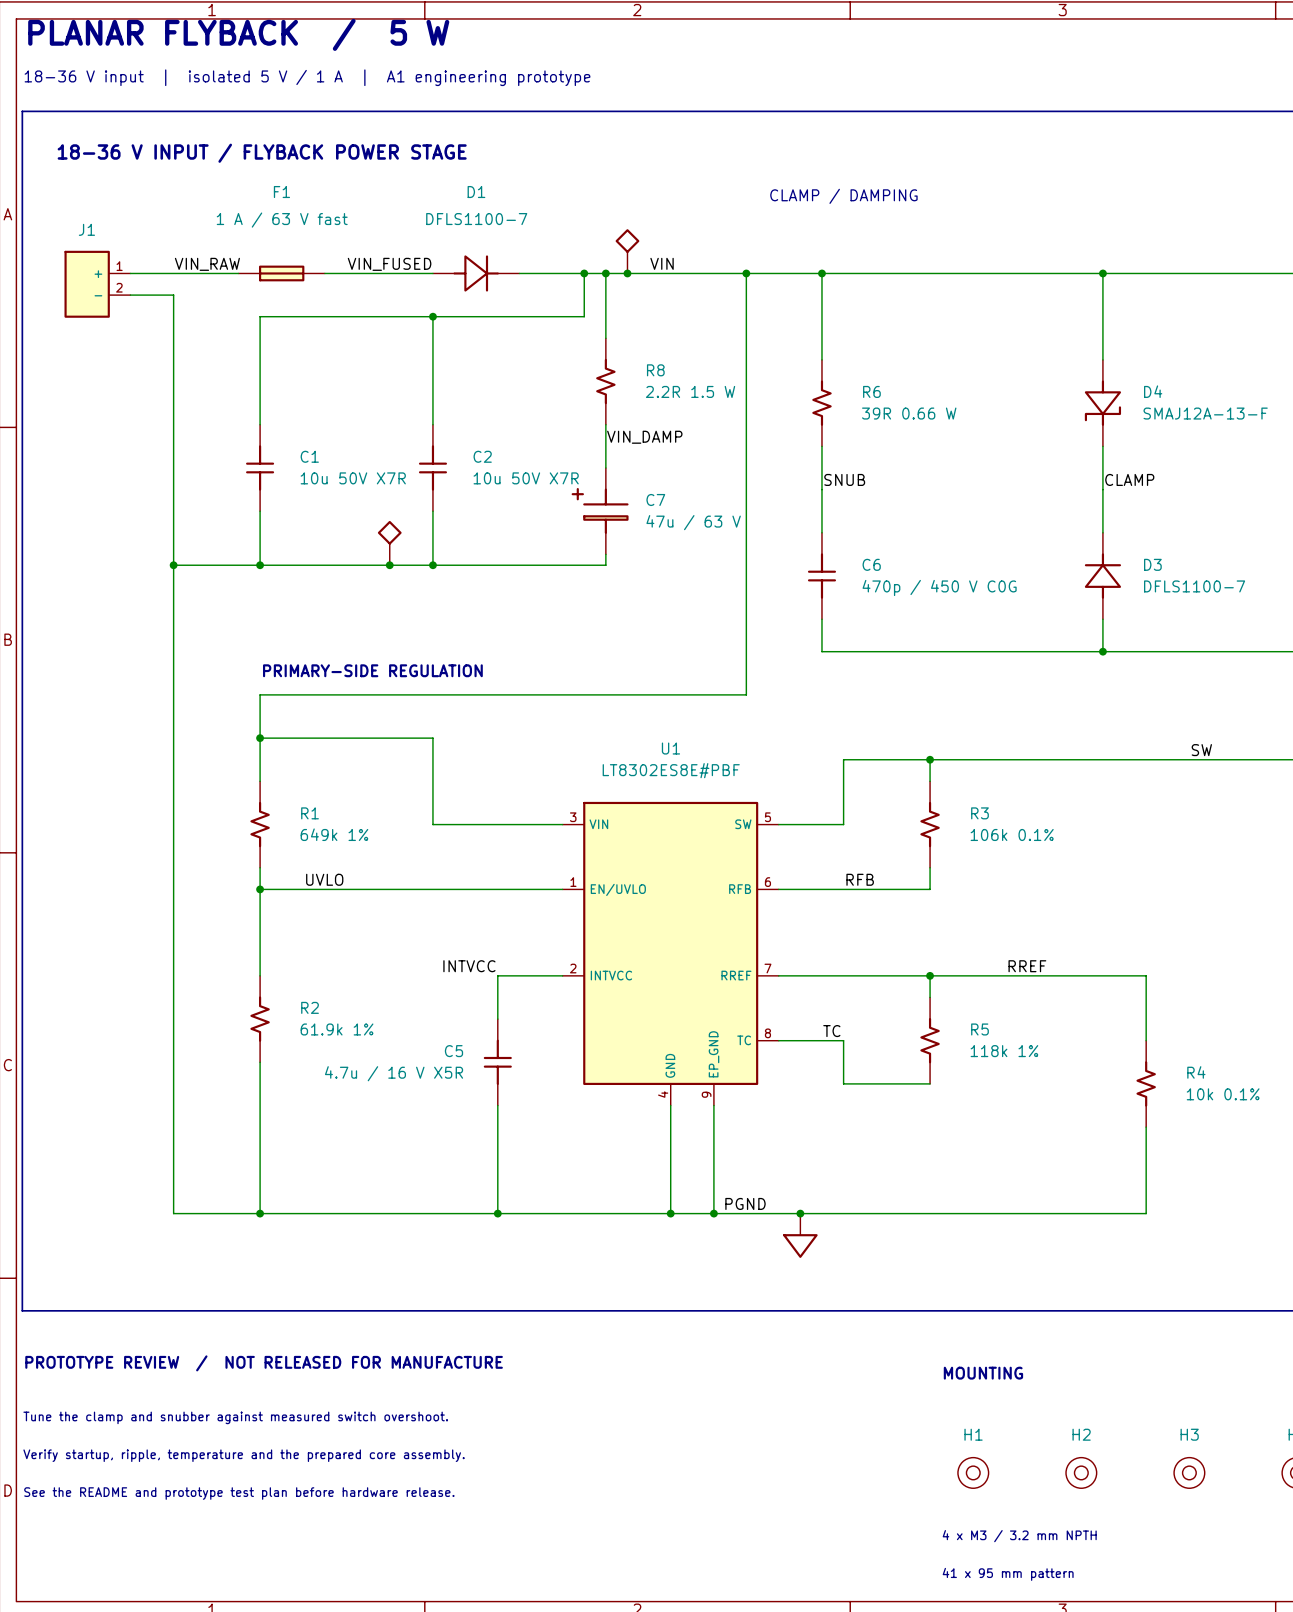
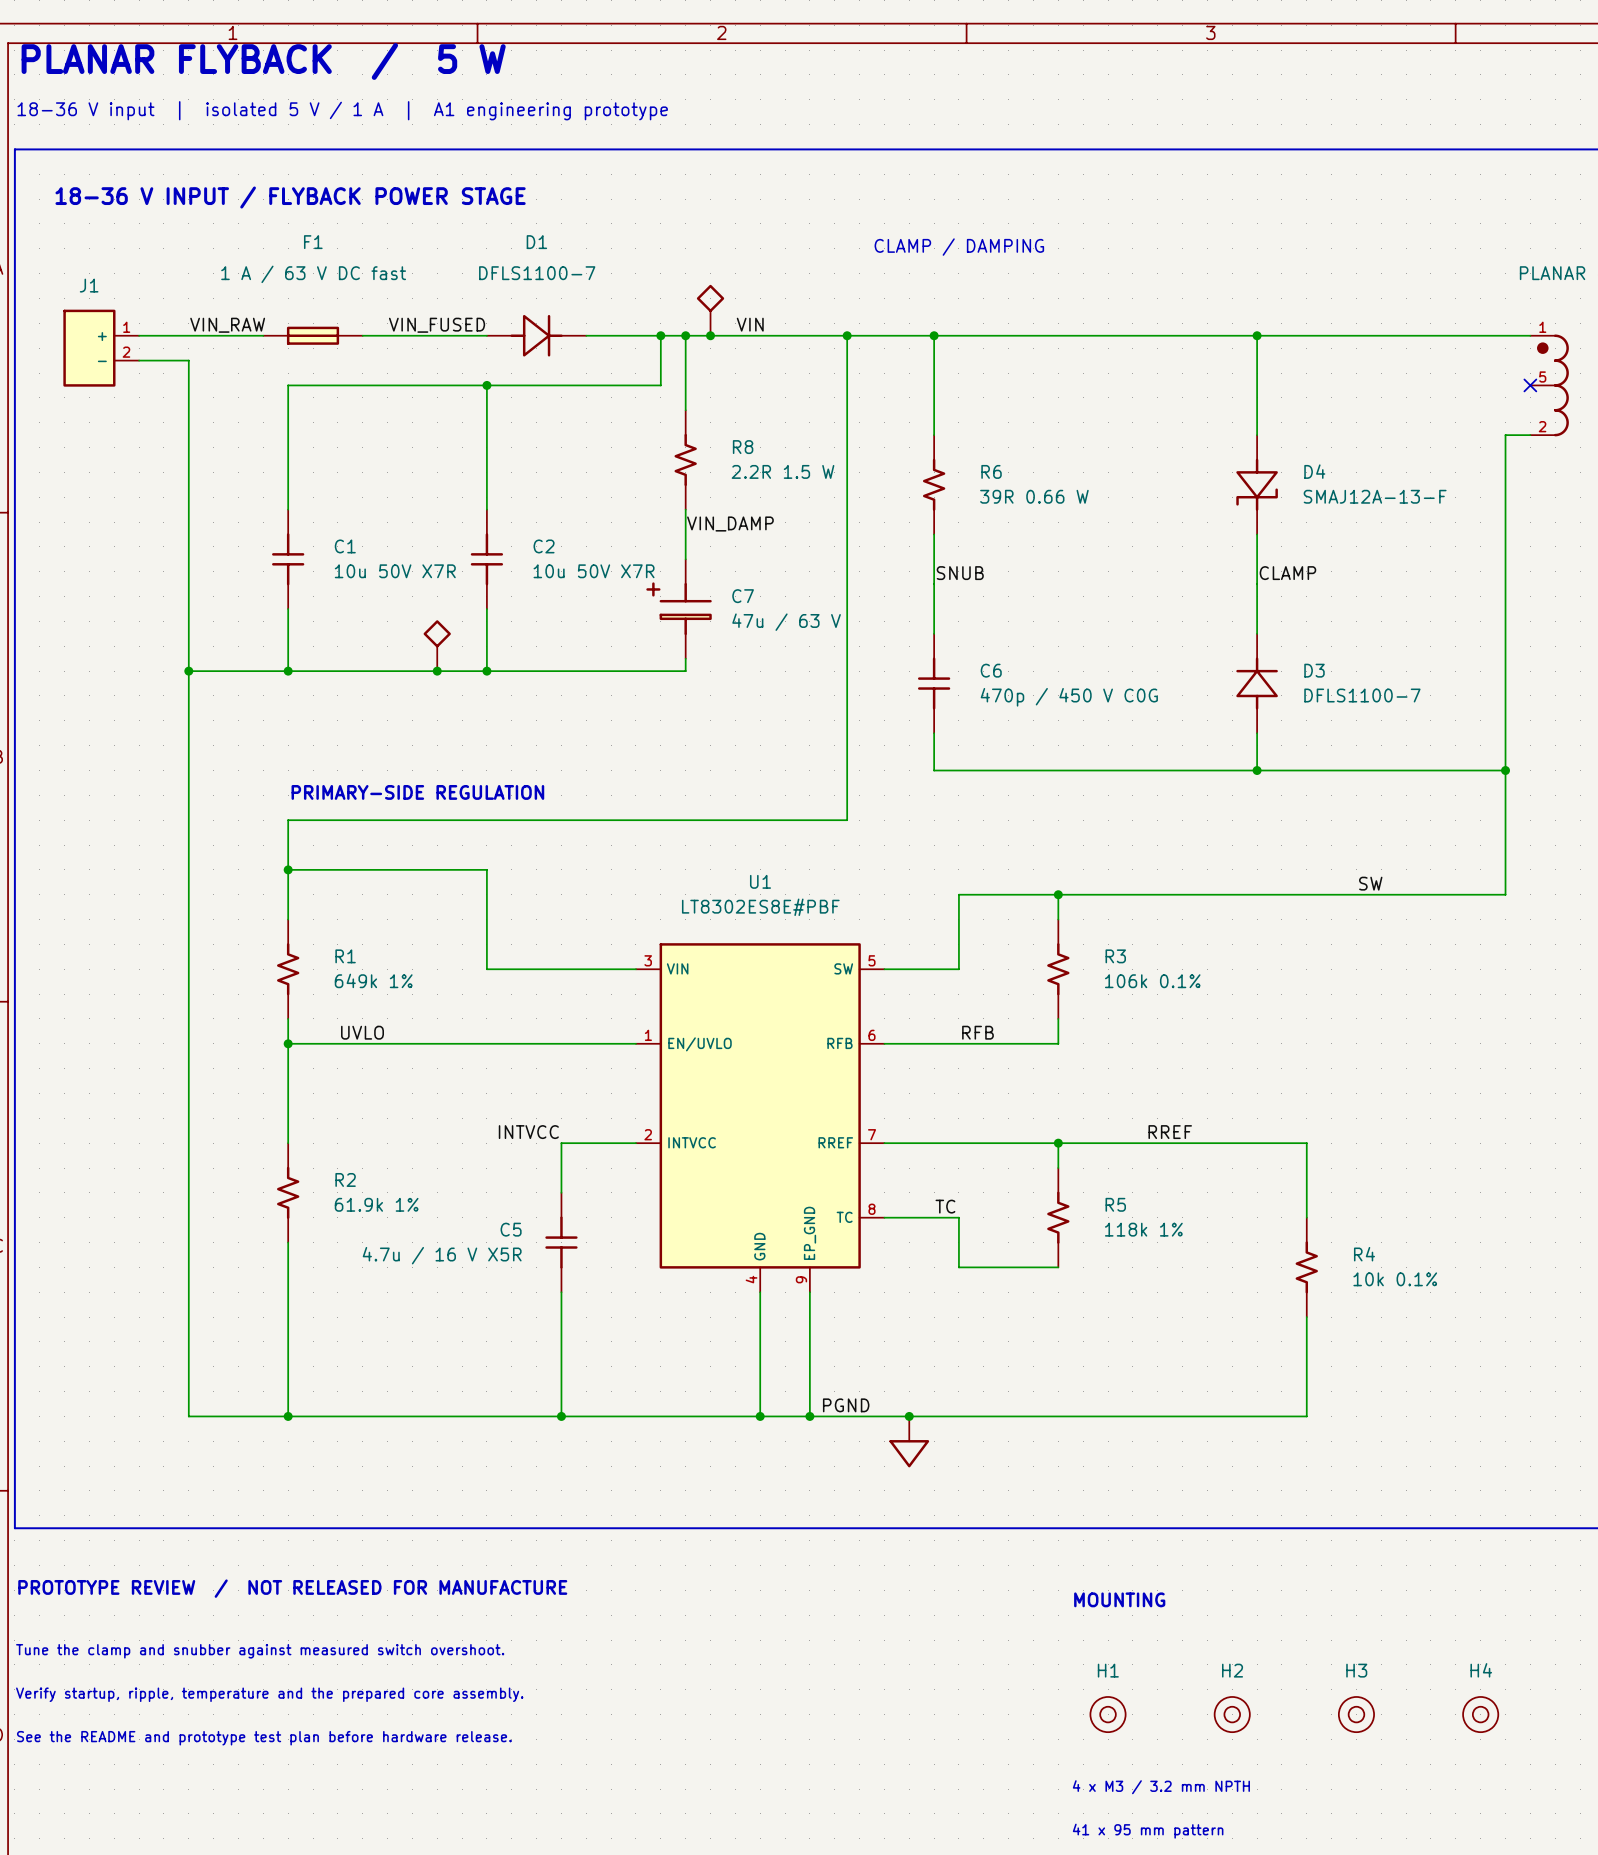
F1 value: 1 A / 63 V fast (282, 220) -> 1 A / 63 V DC fast (313, 274)

